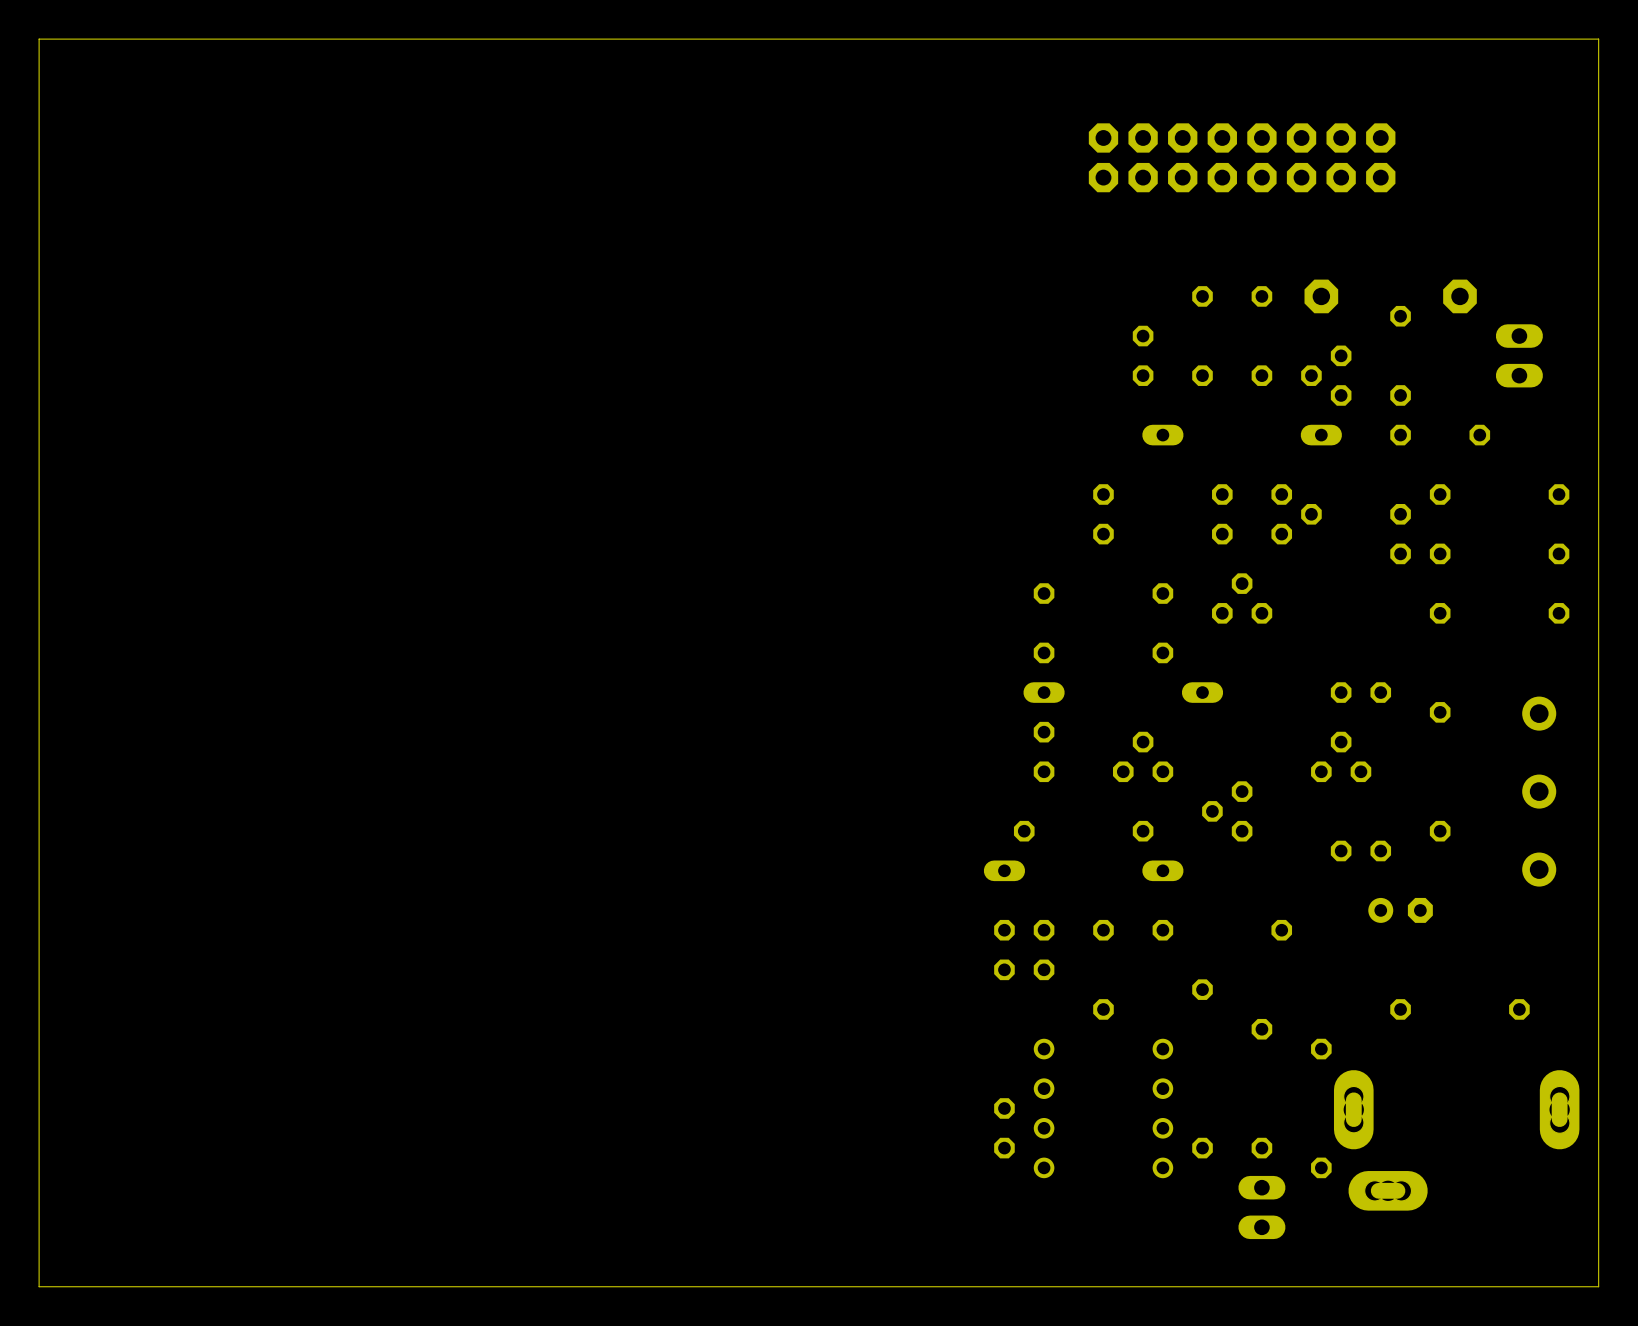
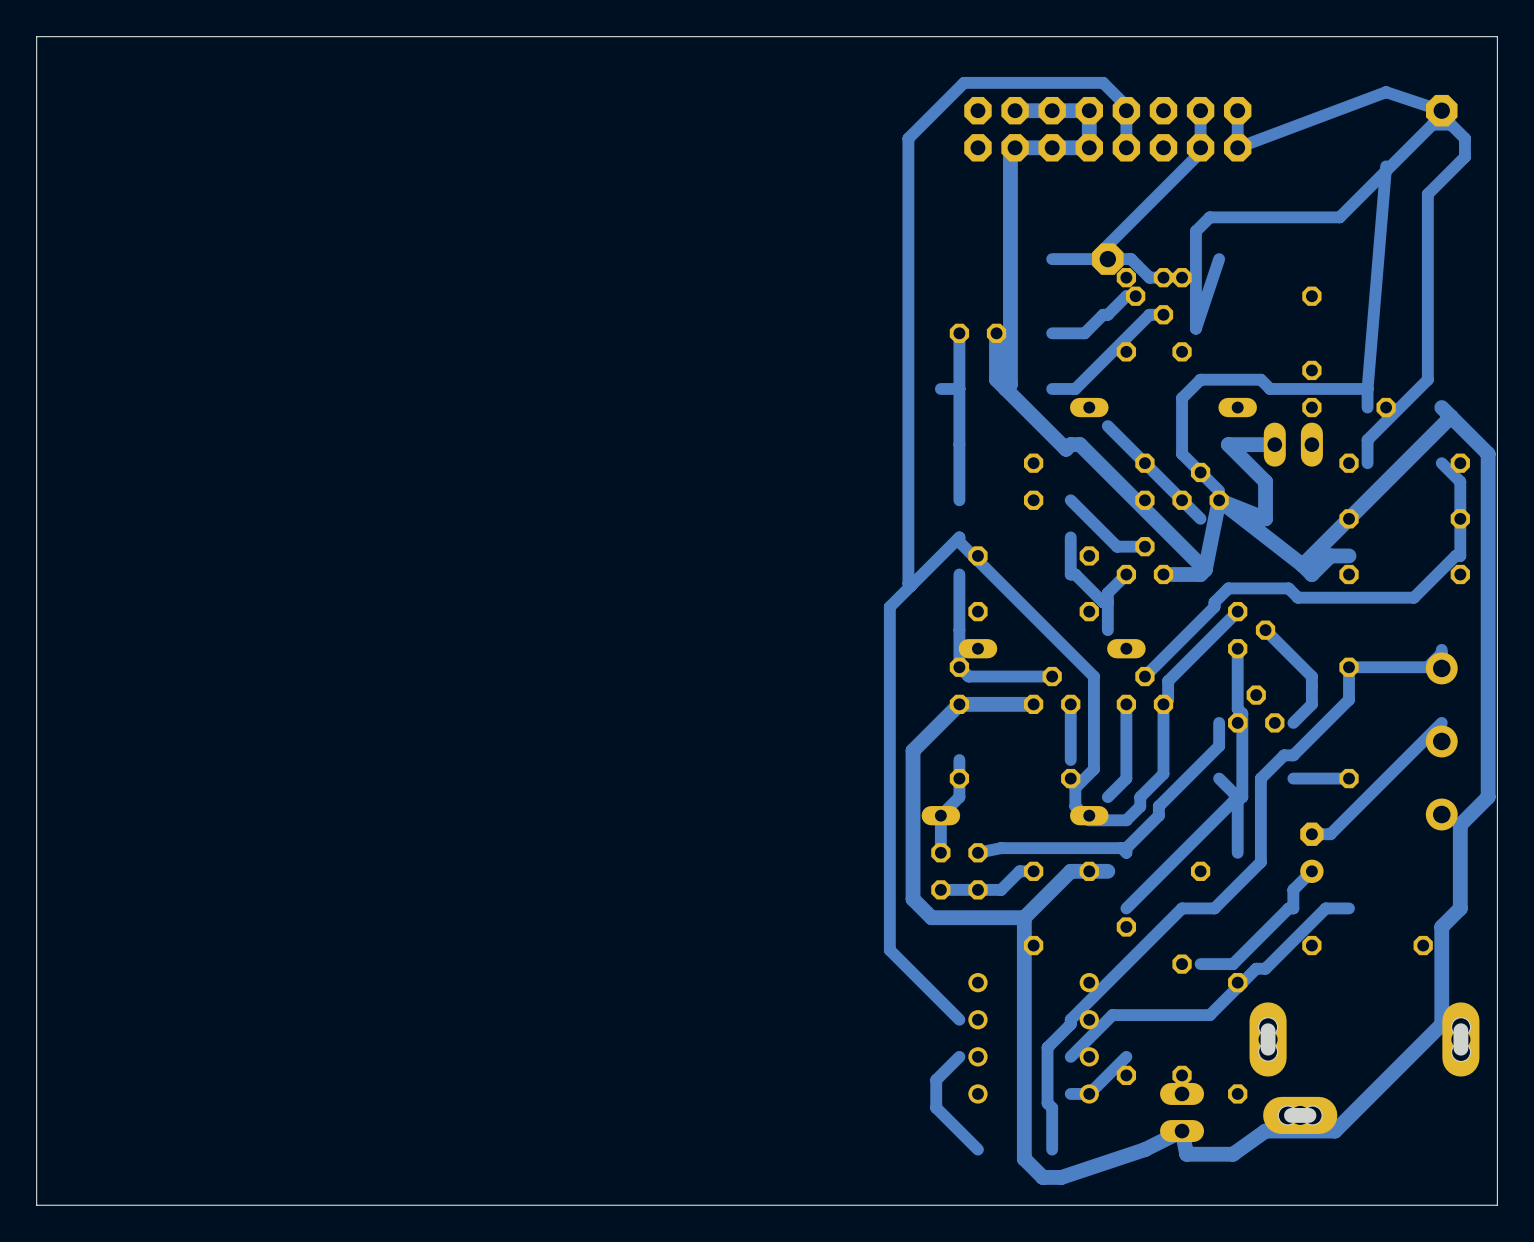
bottom track: none -> (1015, 110) (1089, 110) (1089, 147) (1015, 147) (1010, 152) (1010, 384) (1005, 388)
bottom track: none -> (1200, 110) (1200, 152) (1098, 254) (1107, 259)
bottom track: none -> (1441, 110) (1386, 92) (1237, 147) (1237, 110)
part: none -> (1441, 110)
bottom track: none -> (1126, 147) (1126, 106) (1103, 82) (964, 82) (908, 138) (908, 583) (910, 586)
part position: (1242, 157) -> (1107, 129)
bottom track: none -> (1386, 166) (1367, 388)
bottom track: none -> (1052, 259) (1131, 259) (1149, 277) (1163, 277)
part: none -> (1107, 259)
bottom track: none -> (1219, 259) (1195, 328) (1195, 231) (1209, 217) (1339, 217) (1432, 124) (1451, 124) (1464, 138) (1464, 157) (1427, 194) (1427, 379) (1367, 440) (1367, 463)
part: (1321, 296) -> none
part: (1459, 296) -> none
bottom track: none -> (1135, 296) (1126, 296) (1107, 314) (1103, 314) (1084, 333) (1052, 333)
part: none -> (1149, 296)
bottom track: none -> (1163, 314) (1149, 314) (1075, 388) (1052, 388)
bottom track: none -> (959, 333) (959, 500)
bottom track: none -> (996, 333) (996, 379) (1066, 449) (1070, 444) (1080, 444) (1205, 569)
part rotation: 0° (1143, 355) -> 90° clockwise (977, 333)
part position: (1143, 355) -> (977, 333)
part rotation: 0° (1519, 355) -> 90° clockwise (1293, 444)
part position: (1519, 355) -> (1293, 444)
part: (1326, 375) -> none
bottom track: none -> (959, 388) (940, 388)
bottom track: none -> (1367, 388) (1367, 407)
bottom track: none -> (1367, 388) (1270, 388) (1260, 379) (1200, 379) (1182, 398) (1182, 453) (1219, 491)
bottom track: none -> (1441, 407) (1488, 453) (1488, 797) (1460, 824) (1460, 908) (1441, 926) (1441, 1024) (1335, 1131) (1265, 1131) (1233, 1154) (1186, 1154) (1182, 1131) (1144, 1149) (1061, 1177) (1042, 1177) (1024, 1158) (1024, 917)
bottom track: none -> (1451, 416) (1302, 565)
bottom track: none -> (1107, 426) (1200, 518)
bottom track: none -> (1274, 444) (1228, 444) (1265, 481) (1265, 518) (1219, 500)
bottom track: none -> (1441, 463) (1460, 481) (1460, 555) (1455, 555) (1413, 597) (1297, 597) (1288, 588) (1228, 588) (1214, 602) (1214, 606) (1144, 676)
part rotation: 0° (1296, 514) -> 90° counterclockwise (1200, 486)
bottom track: none -> (1070, 500) (1117, 546) (1144, 546)
bottom track: none -> (1219, 500) (1302, 565)
bottom track: none -> (1219, 500) (1205, 569)
part: (1400, 534) -> none
bottom track: none -> (1070, 537) (1070, 574) (1075, 574) (1103, 602) (1107, 602)
bottom track: none -> (1349, 555) (1330, 555) (1311, 574) (1302, 565)
part position: (1242, 598) -> (1144, 560)
bottom track: none -> (1205, 569) (1200, 574) (1163, 574)
bottom track: none -> (959, 574) (959, 667) (968, 676) (1052, 676)
bottom track: none -> (1126, 574) (1107, 593) (1107, 630)
bottom track: none -> (1237, 611) (1168, 681) (1168, 699) (1163, 704) (1163, 773) (1140, 797) (1140, 806) (1126, 820) (1089, 820) (1075, 806) (1075, 787) (1093, 769) (1093, 676) (959, 542) (959, 537) (889, 606) (889, 950) (959, 1019)
part: none -> (1251, 630)
bottom track: none -> (1265, 630) (1311, 676) (1311, 704) (1293, 722)
bottom track: none -> (1237, 648) (1237, 709) (1242, 713) (1242, 797) (1237, 797)
part: (1360, 692) -> none
bottom track: none -> (1441, 649) (1441, 653) (1427, 667) (1349, 667) (1349, 699) (1293, 755) (1284, 755) (1260, 778) (1260, 862) (1214, 908) (1182, 908) (1070, 1019) (1070, 1024) (1047, 1047) (1047, 1103) (1052, 1107) (1052, 1149)
part: none -> (1144, 690)
part position: (1044, 751) -> (959, 685)
bottom track: none -> (1033, 704) (959, 704) (913, 750) (913, 899) (931, 917) (1024, 917)
bottom track: none -> (1070, 704) (1070, 760)
bottom track: none -> (1126, 704) (1126, 778) (1107, 797)
part position: (1143, 756) -> (1052, 690)
bottom track: none -> (1219, 722) (1219, 746) (1158, 806) (1158, 815) (1126, 848) (1126, 852) (1121, 848) (1001, 848) (977, 852)
bottom track: none -> (1441, 722) (1330, 834) (1311, 834)
bottom track: none -> (959, 760) (959, 797) (940, 815) (940, 852)
part: (1227, 811) -> none
bottom track: none -> (1219, 778) (1237, 797)
bottom track: none -> (1349, 778) (1293, 778)
bottom track: none -> (1237, 797) (1237, 852)
part: (1360, 851) -> none
bottom track: none -> (1237, 801) (1233, 801) (1126, 908)
part rotation: 0° (1400, 910) -> 90° counterclockwise (1311, 852)
part: none -> (940, 871)
part: (1024, 930) -> none
part: none -> (977, 871)
bottom track: none -> (1033, 871) (1019, 871) (1001, 889) (940, 889)
bottom track: none -> (1107, 871) (1070, 871) (1024, 917)
bottom track: none -> (1311, 871) (1293, 889) (1293, 908) (1288, 908) (1233, 964) (1200, 964)
part: (1024, 969) -> none
bottom track: none -> (1349, 908) (1325, 908) (1265, 968) (1256, 968) (1209, 1015) (1112, 1015) (1070, 1056)
part: (1004, 1128) -> none
bottom track: none -> (959, 1056) (936, 1080) (936, 1107) (977, 1149)
bottom track: none -> (1126, 1056) (1089, 1093) (1070, 1093)
part position: (1261, 1207) -> (1182, 1112)

